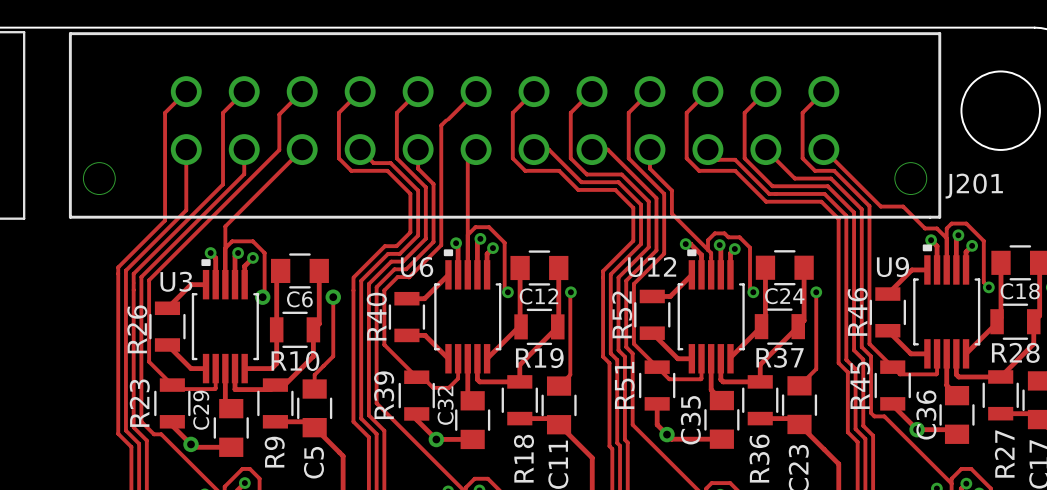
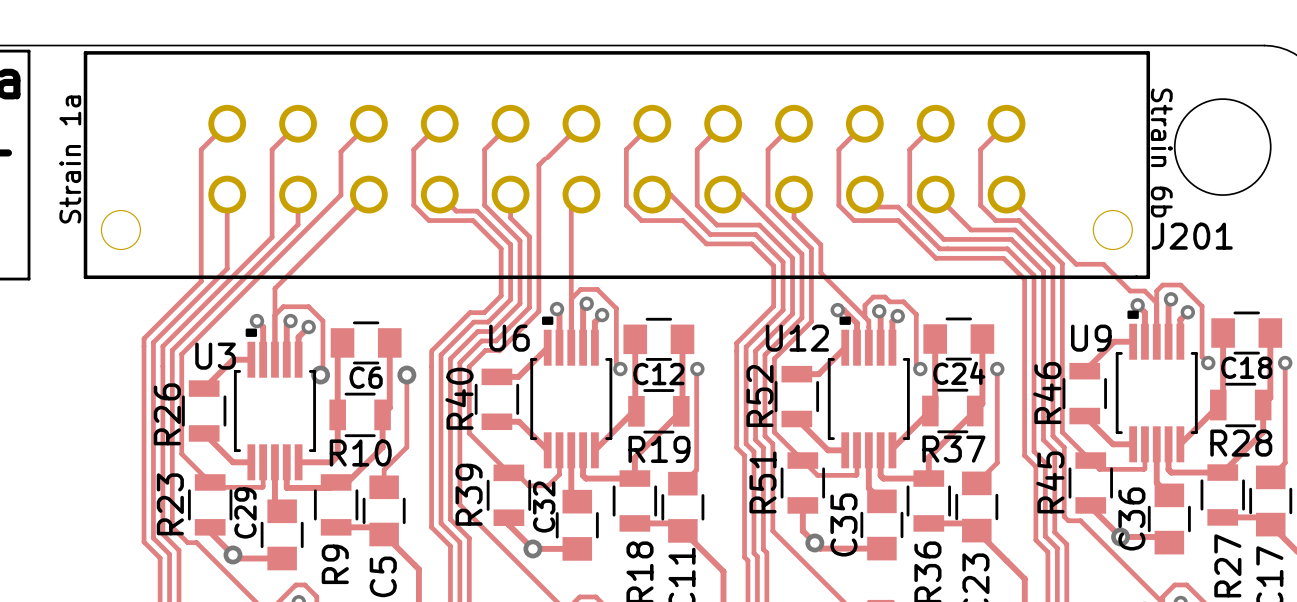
text: none -> Strain 6b (1161, 152)
text: none -> Strain 1a (70, 159)

